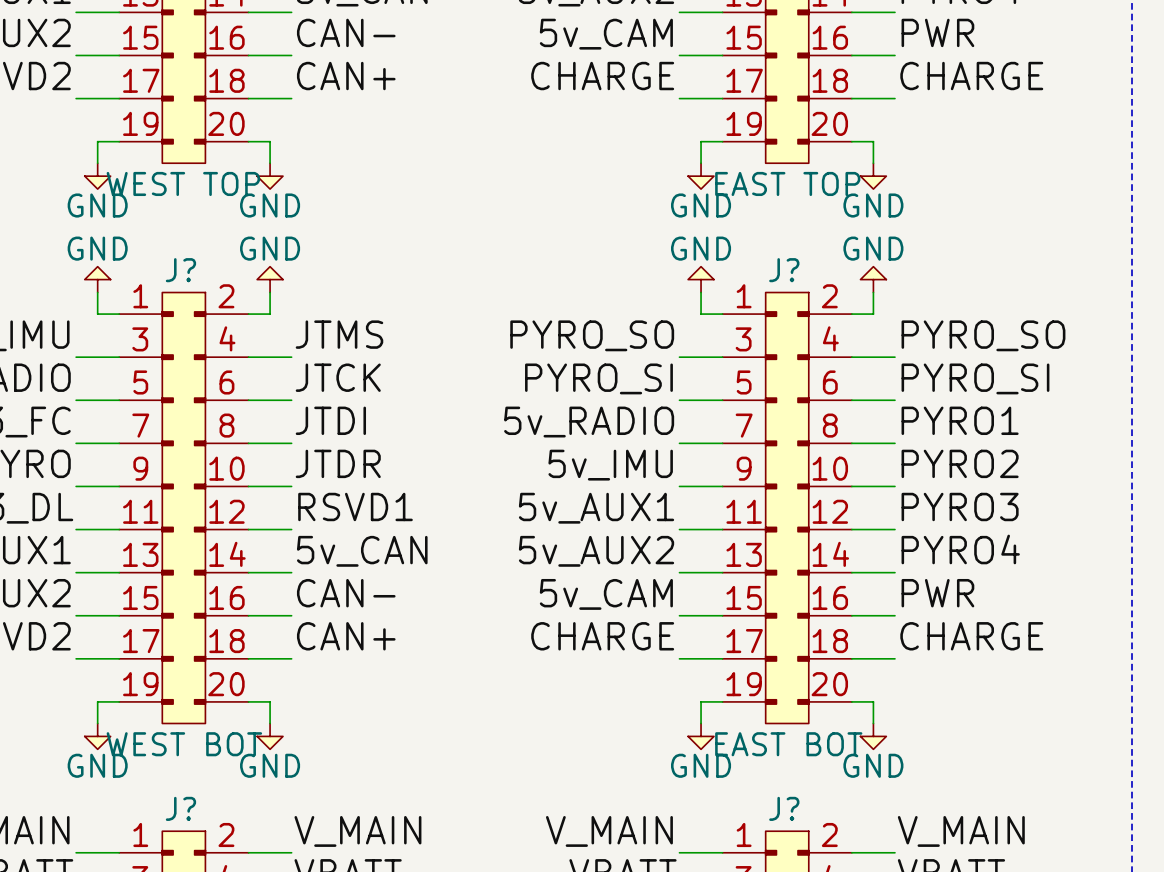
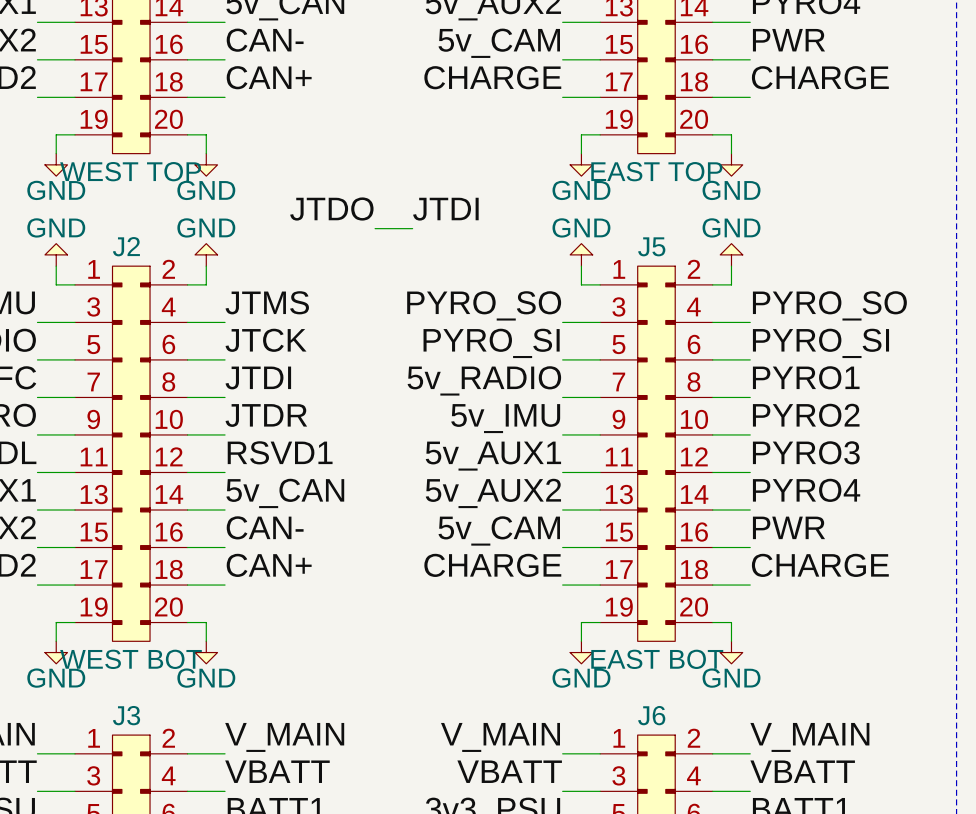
label: none -> JTDO (331, 209)
label: none -> JTDI (445, 209)
wire: none -> (375, 228) (412, 228)
J? name: J? (180, 270) -> J2 (126, 246)
J? name: J? (784, 270) -> J5 (651, 246)
J? name: J? (180, 808) -> J3 (126, 715)
J? name: J? (784, 808) -> J6 (651, 715)

